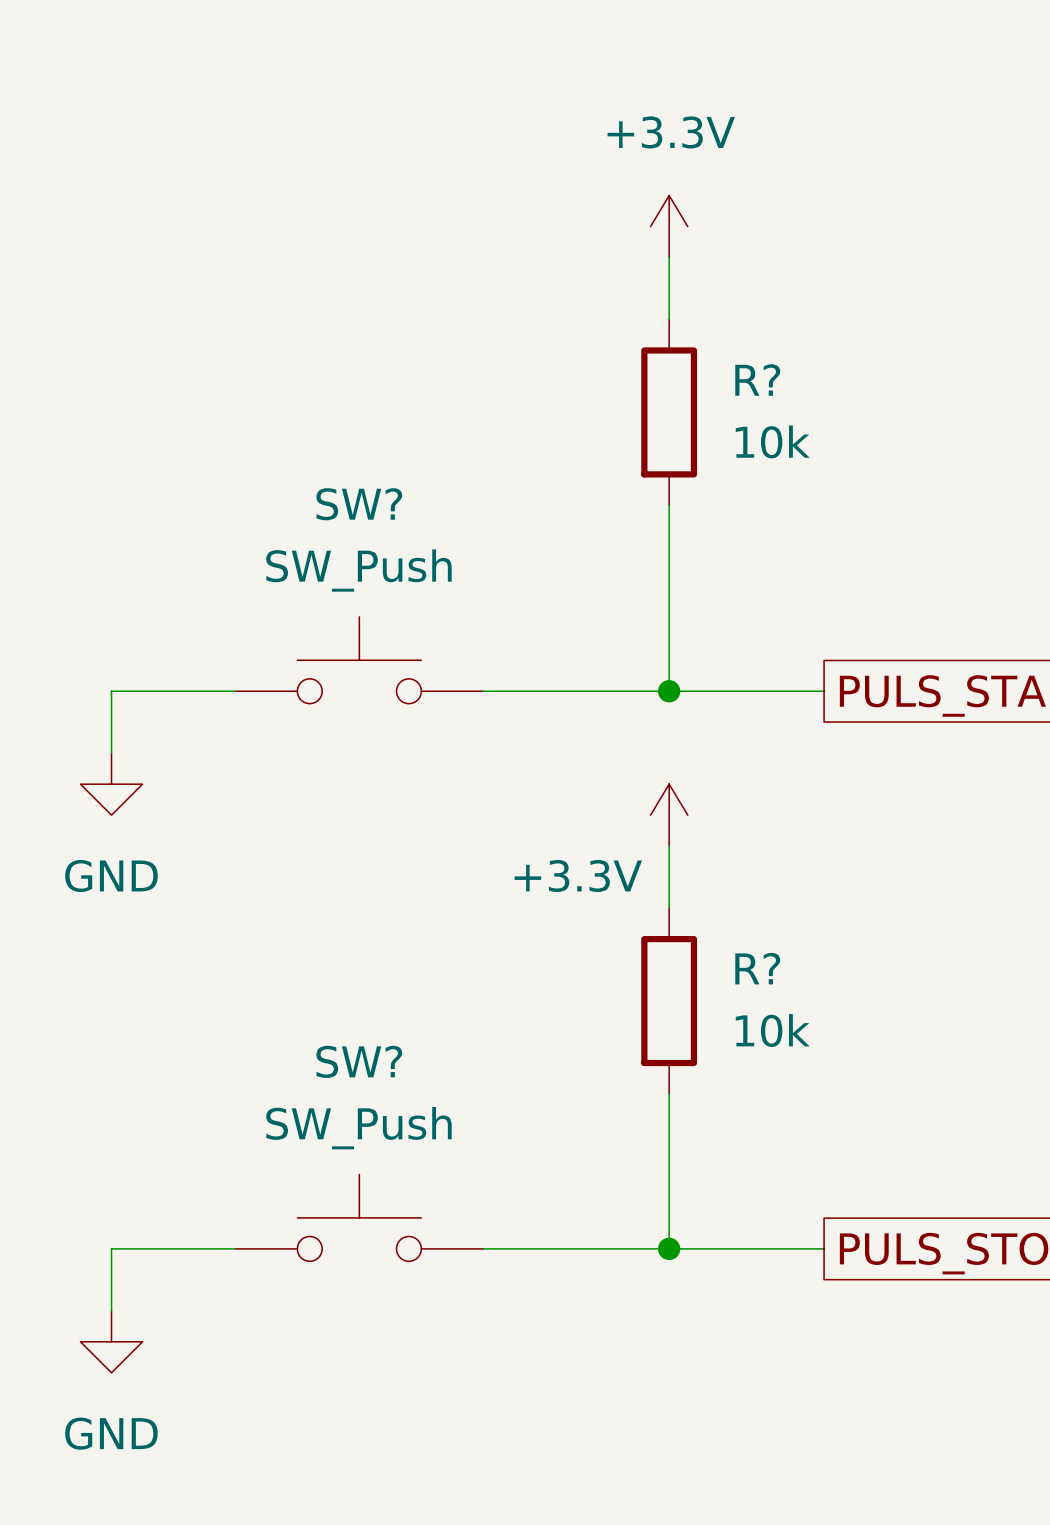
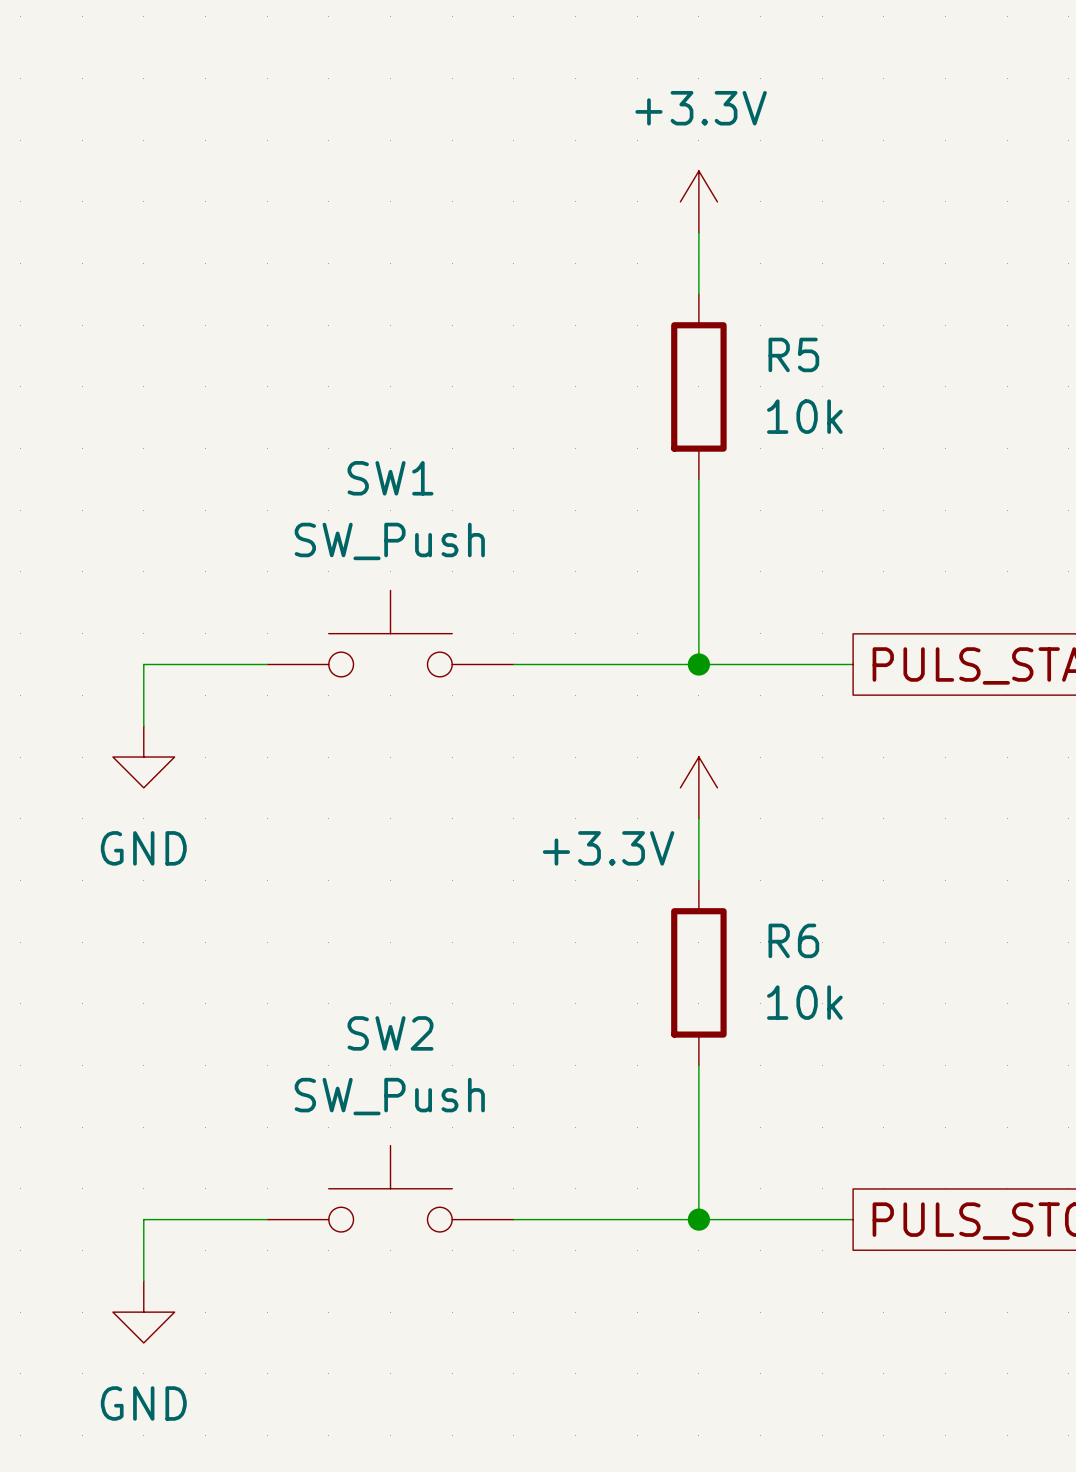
R? name: R? (757, 380) -> R5 (793, 354)
SW? name: SW? (359, 504) -> SW1 (390, 478)
R? name: R? (757, 968) -> R6 (793, 940)
SW? name: SW? (359, 1061) -> SW2 (390, 1033)

